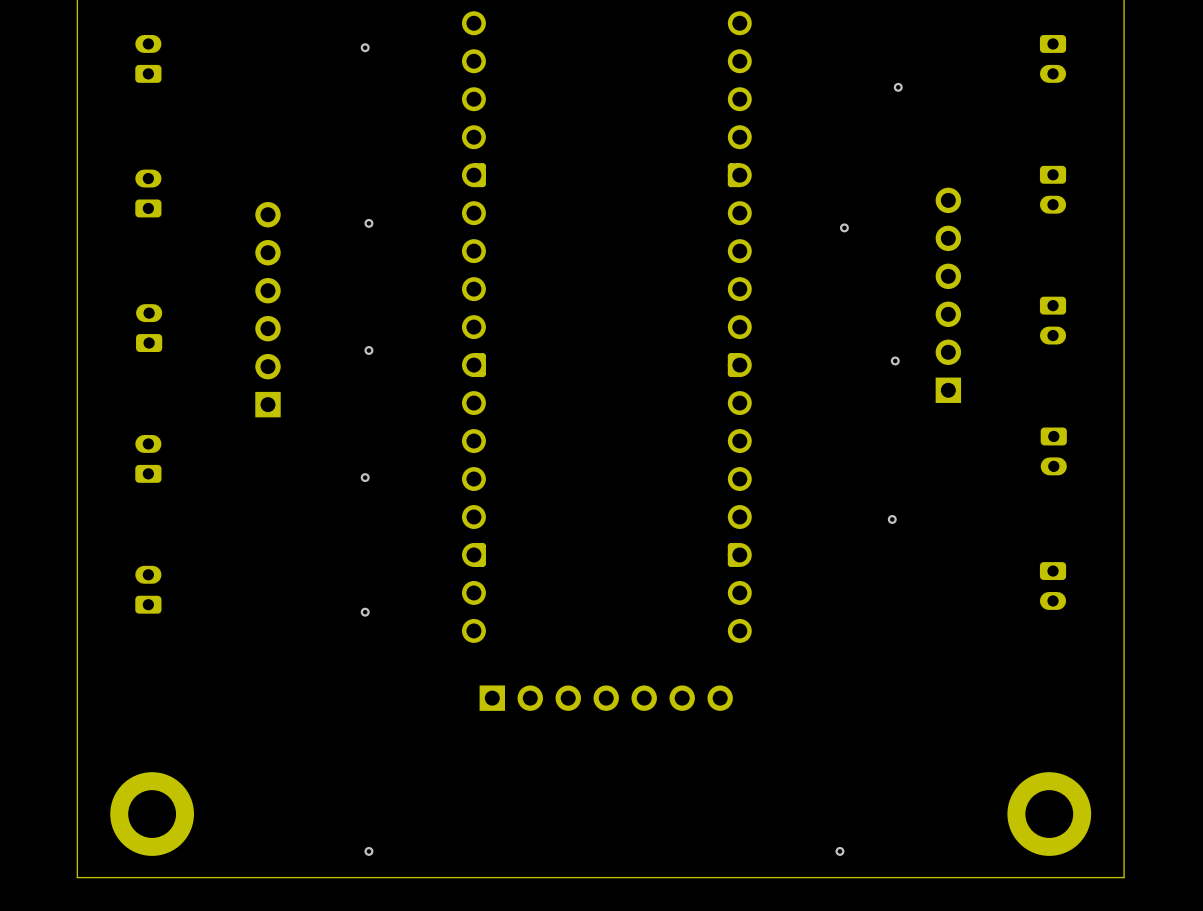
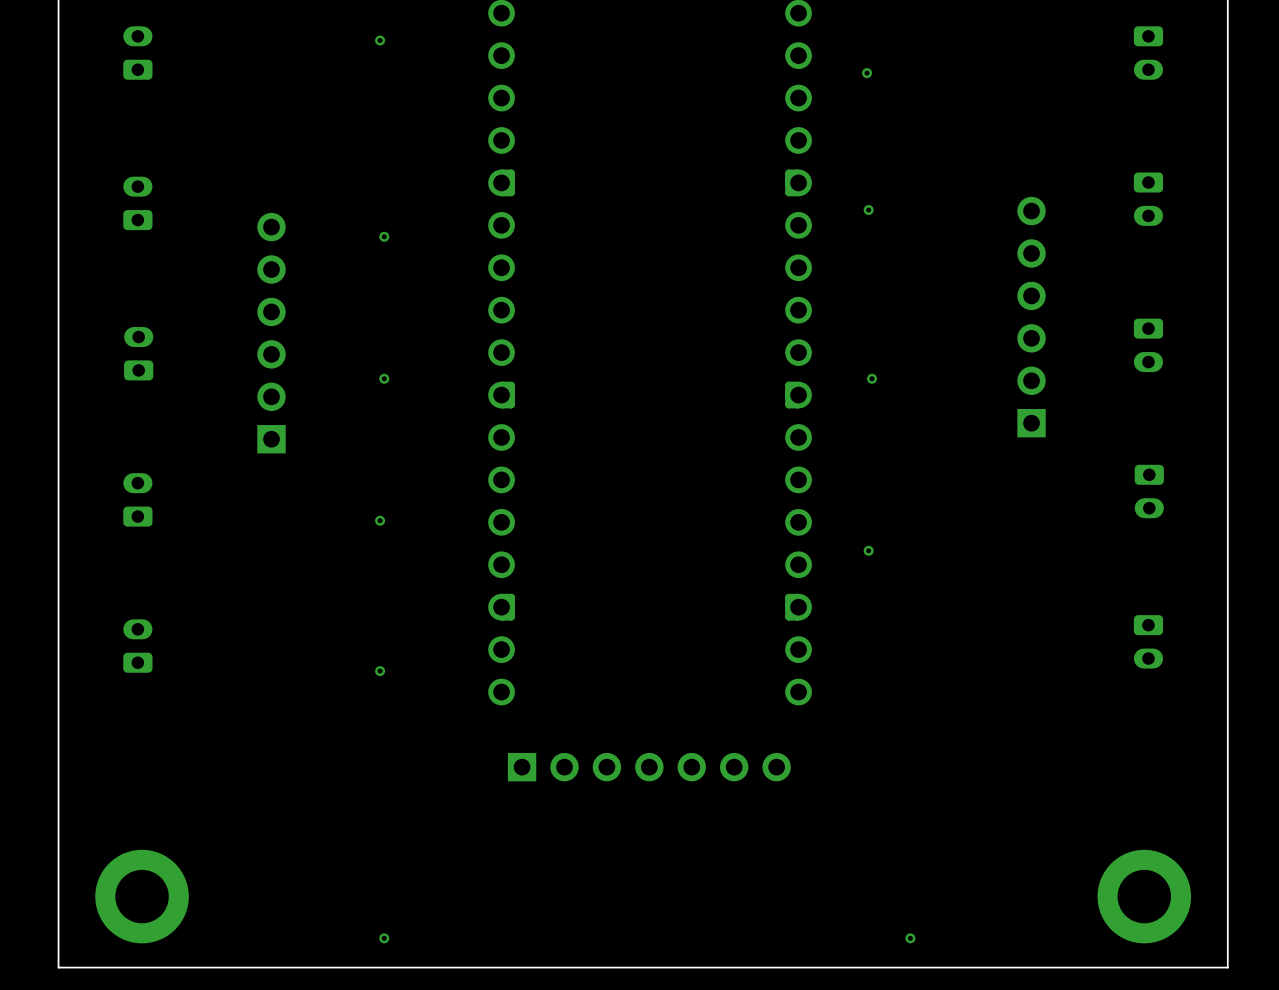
via: none -> (867, 73)
via: (898, 87) -> none
via position: (844, 227) -> (868, 210)
via: none -> (872, 378)
via: (895, 360) -> none
via: none -> (868, 550)
via: (892, 519) -> none

